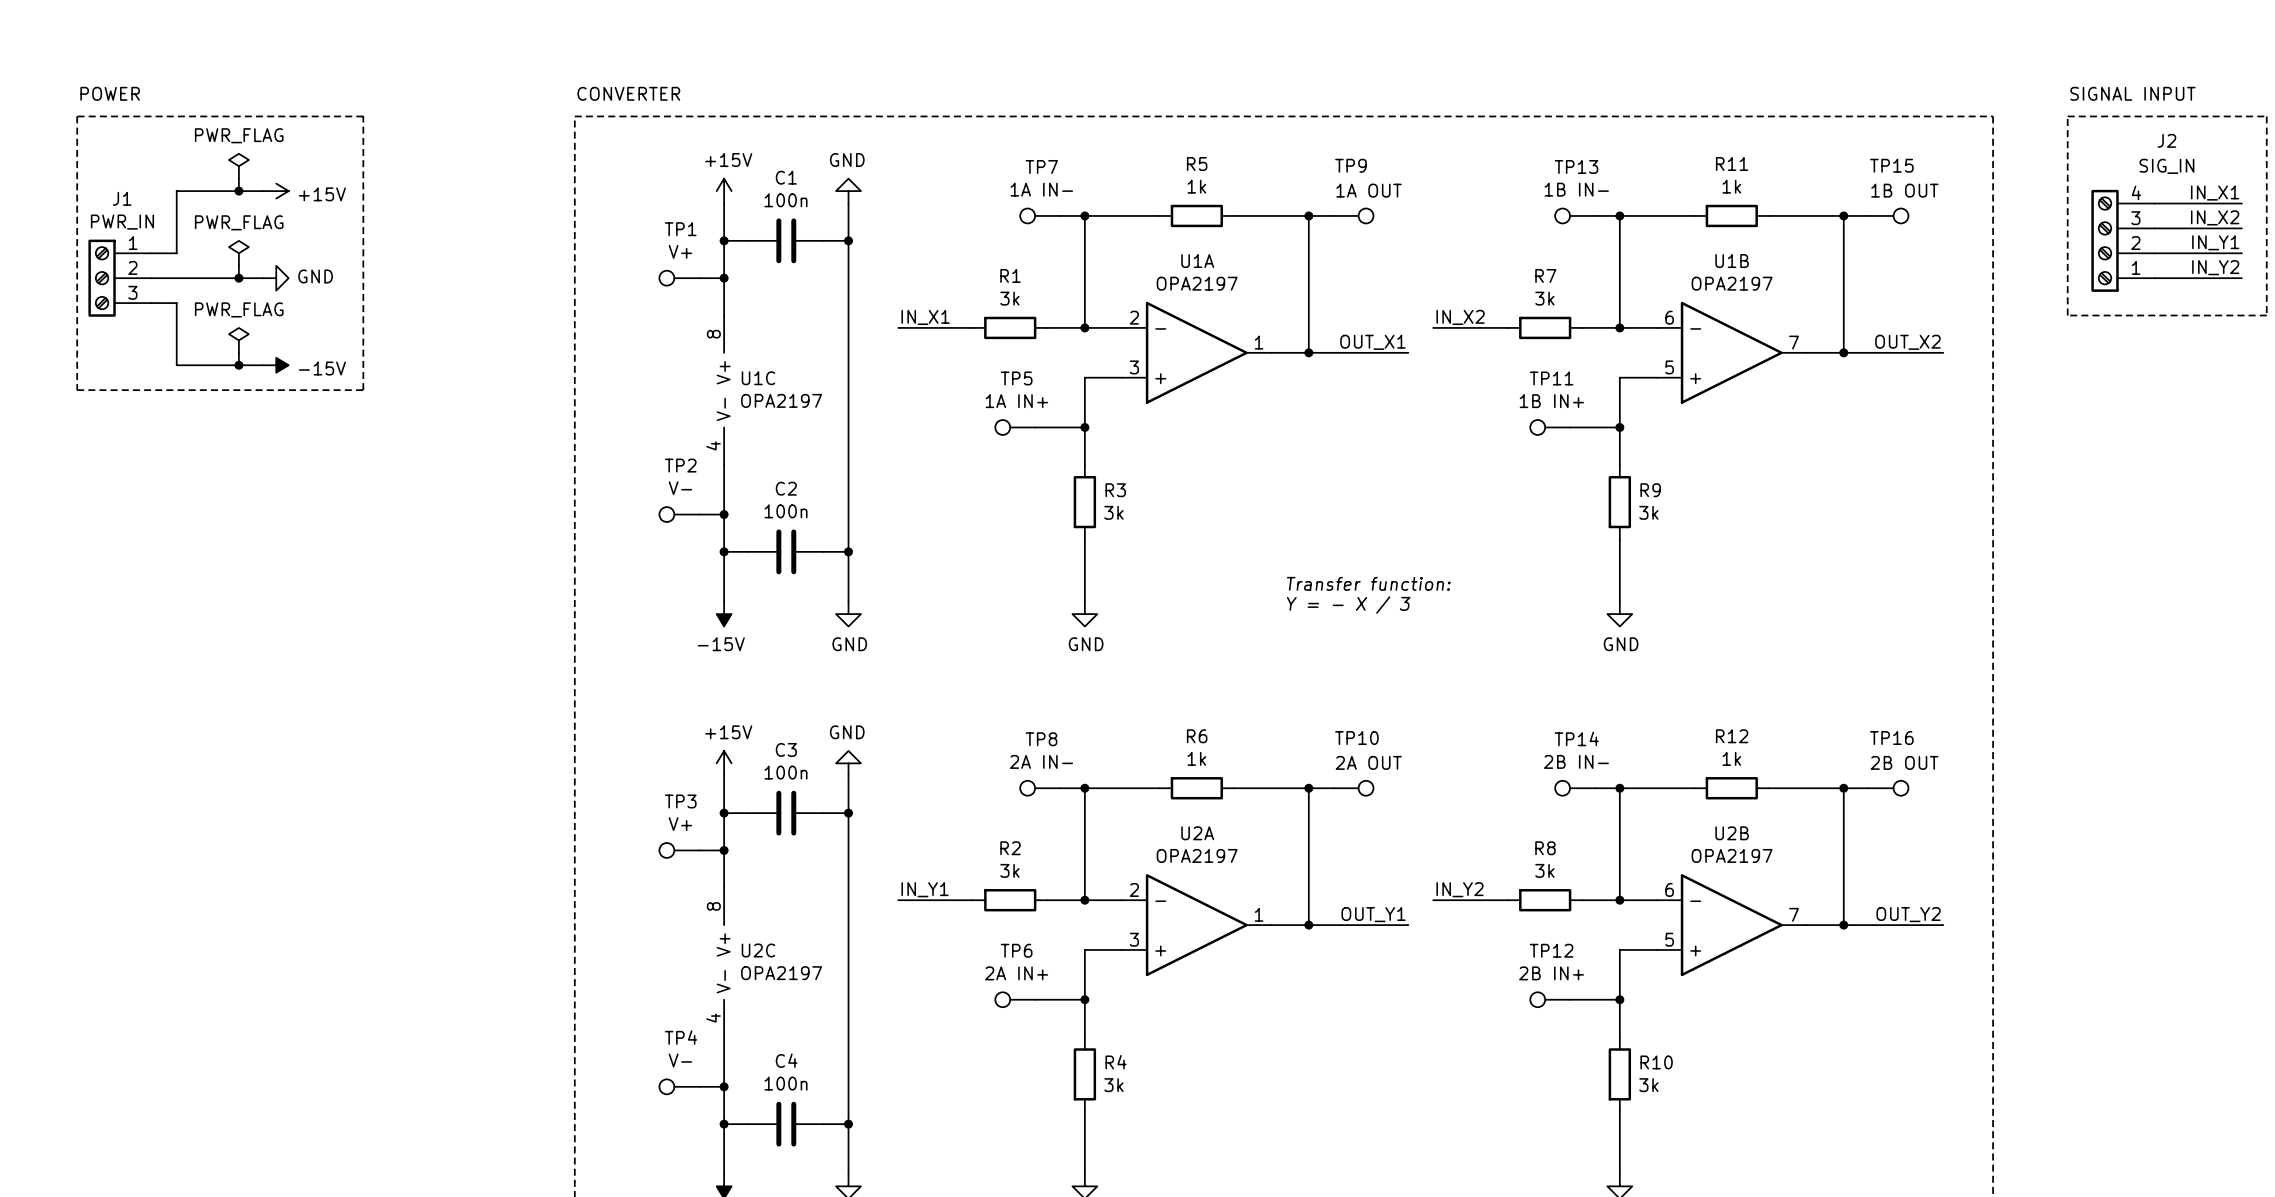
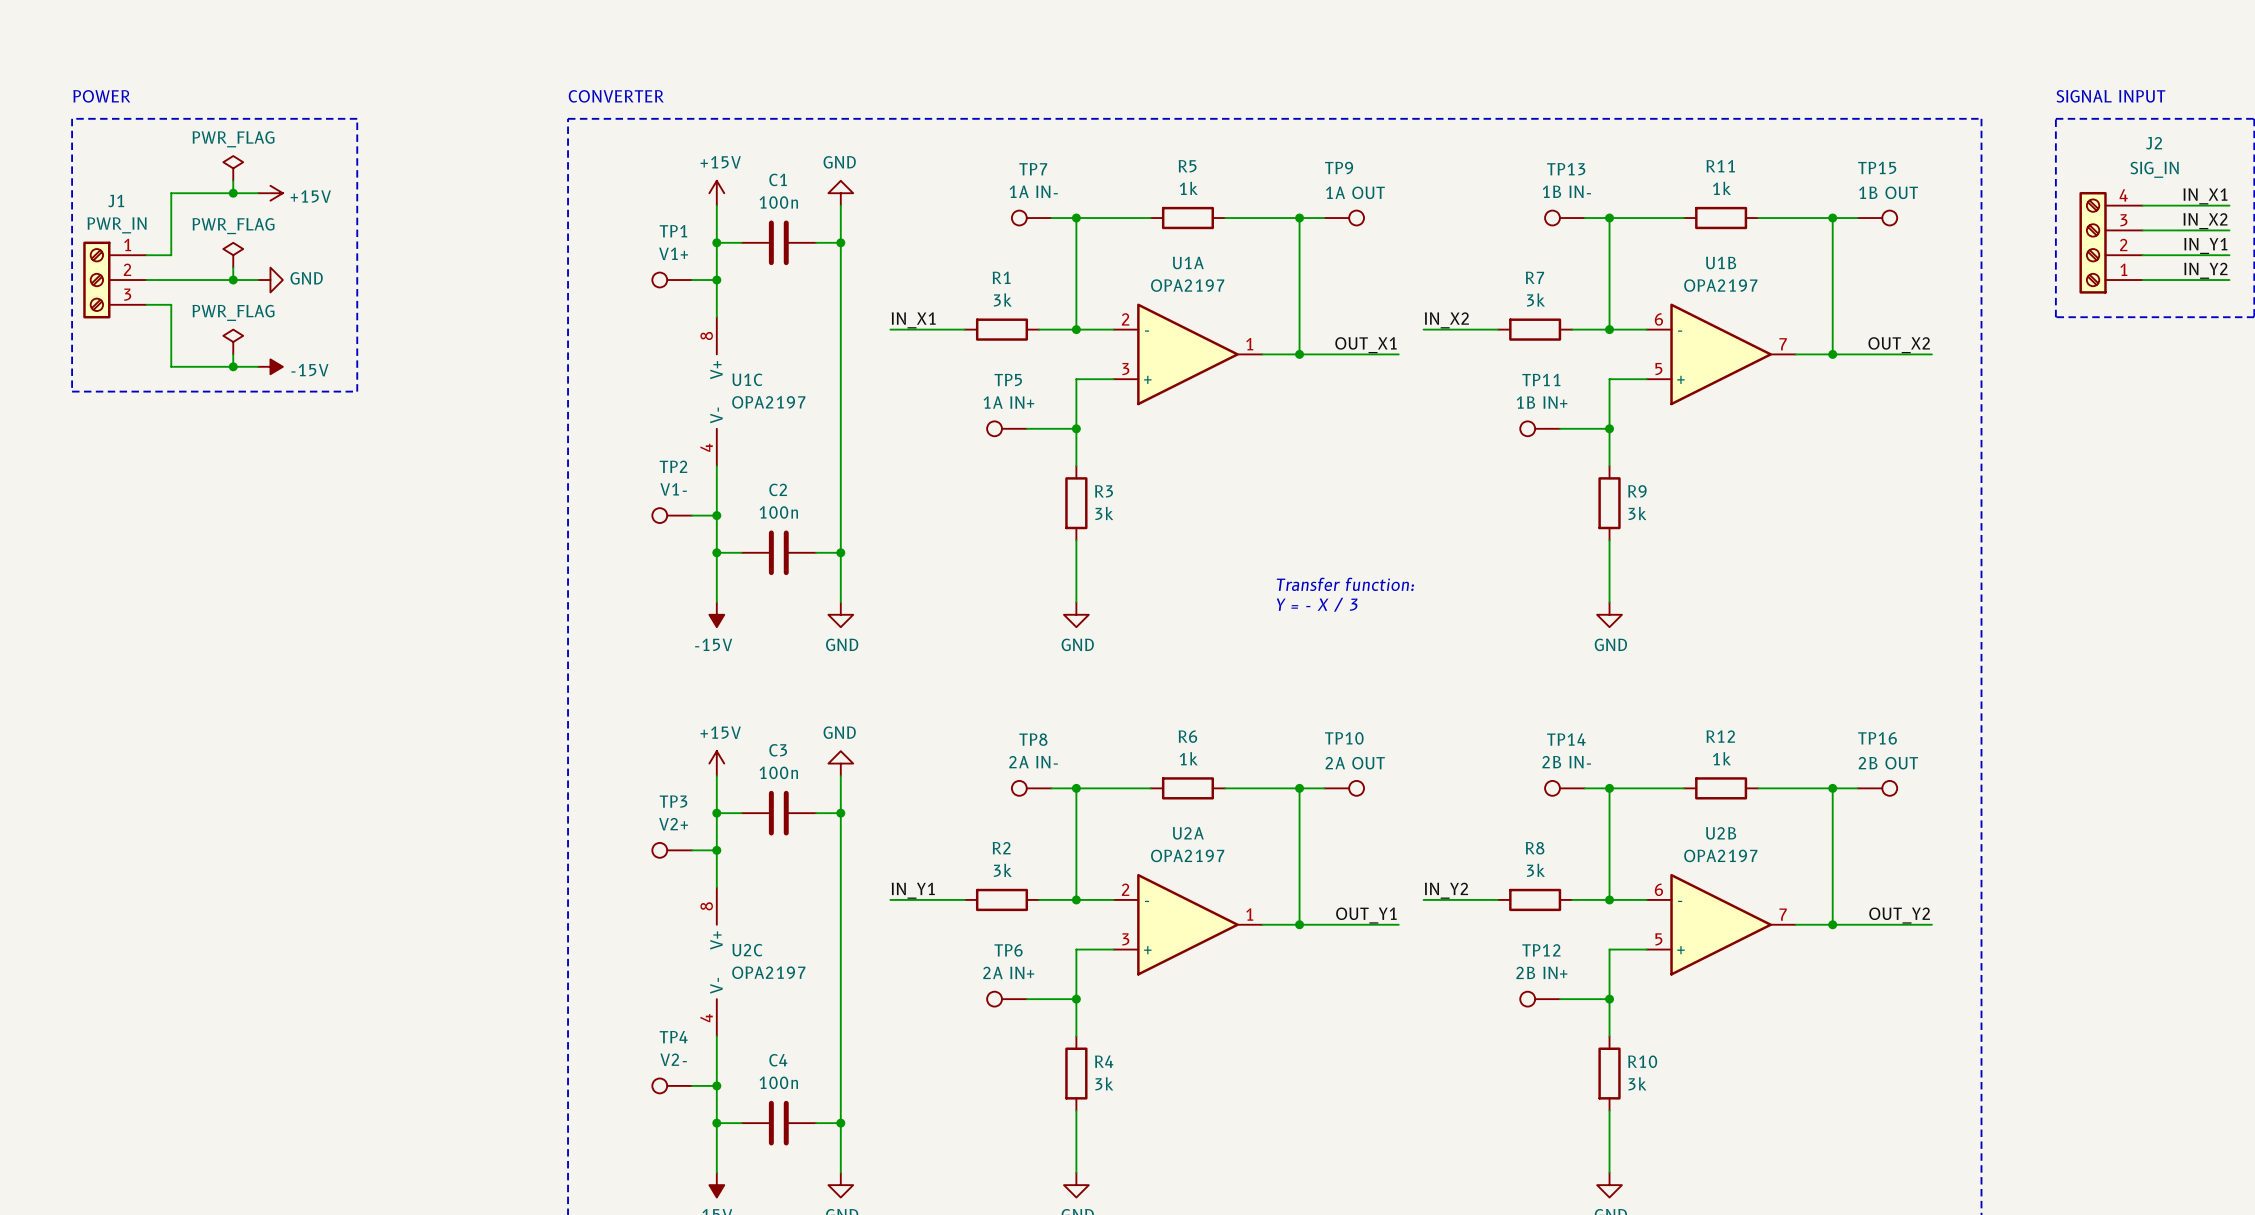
TP1 value: V+ (680, 251) -> V1+ (673, 253)
TP2 value: V- (680, 488) -> V1- (673, 489)
TP3 value: V+ (680, 824) -> V2+ (673, 824)
TP4 value: V- (680, 1060) -> V2- (673, 1059)

